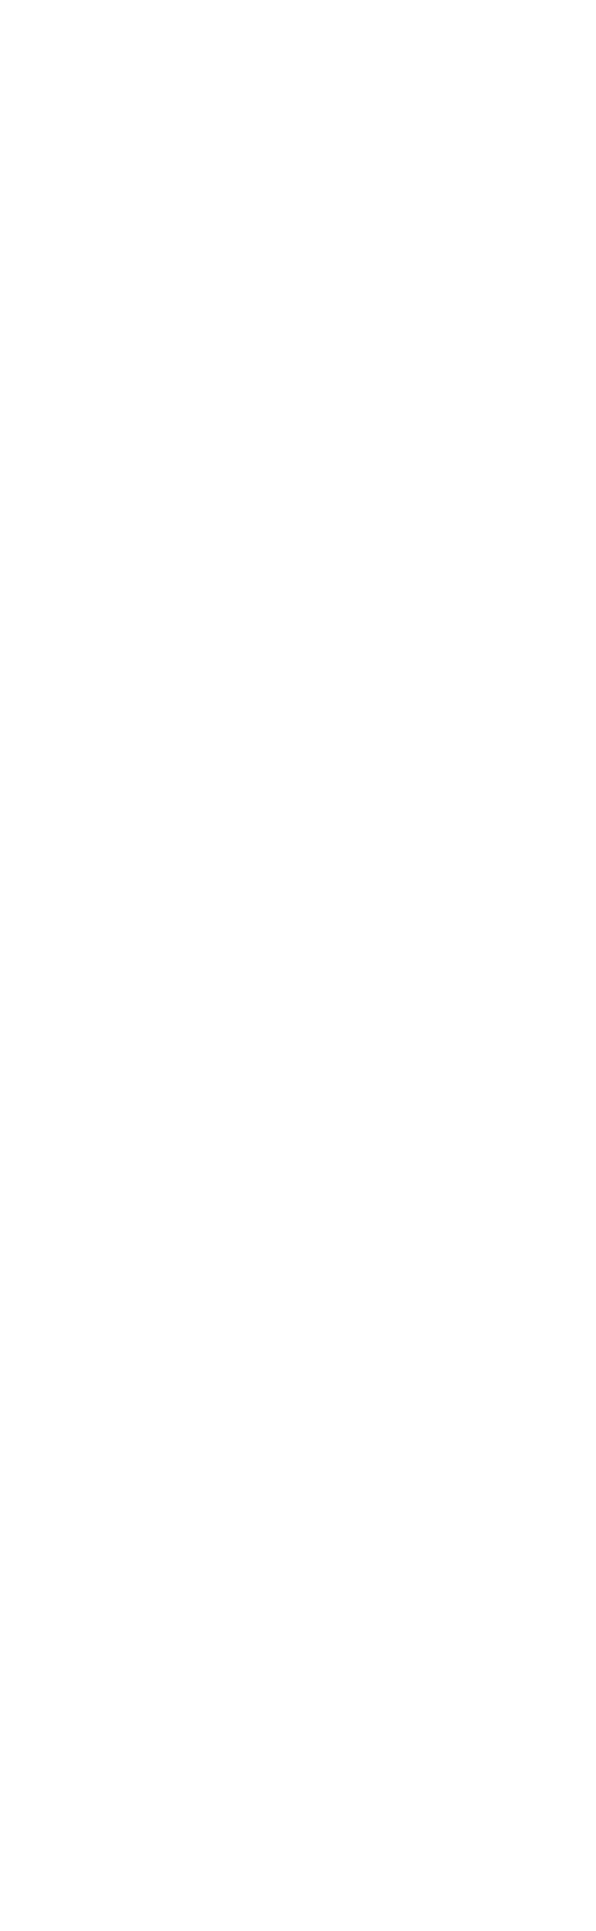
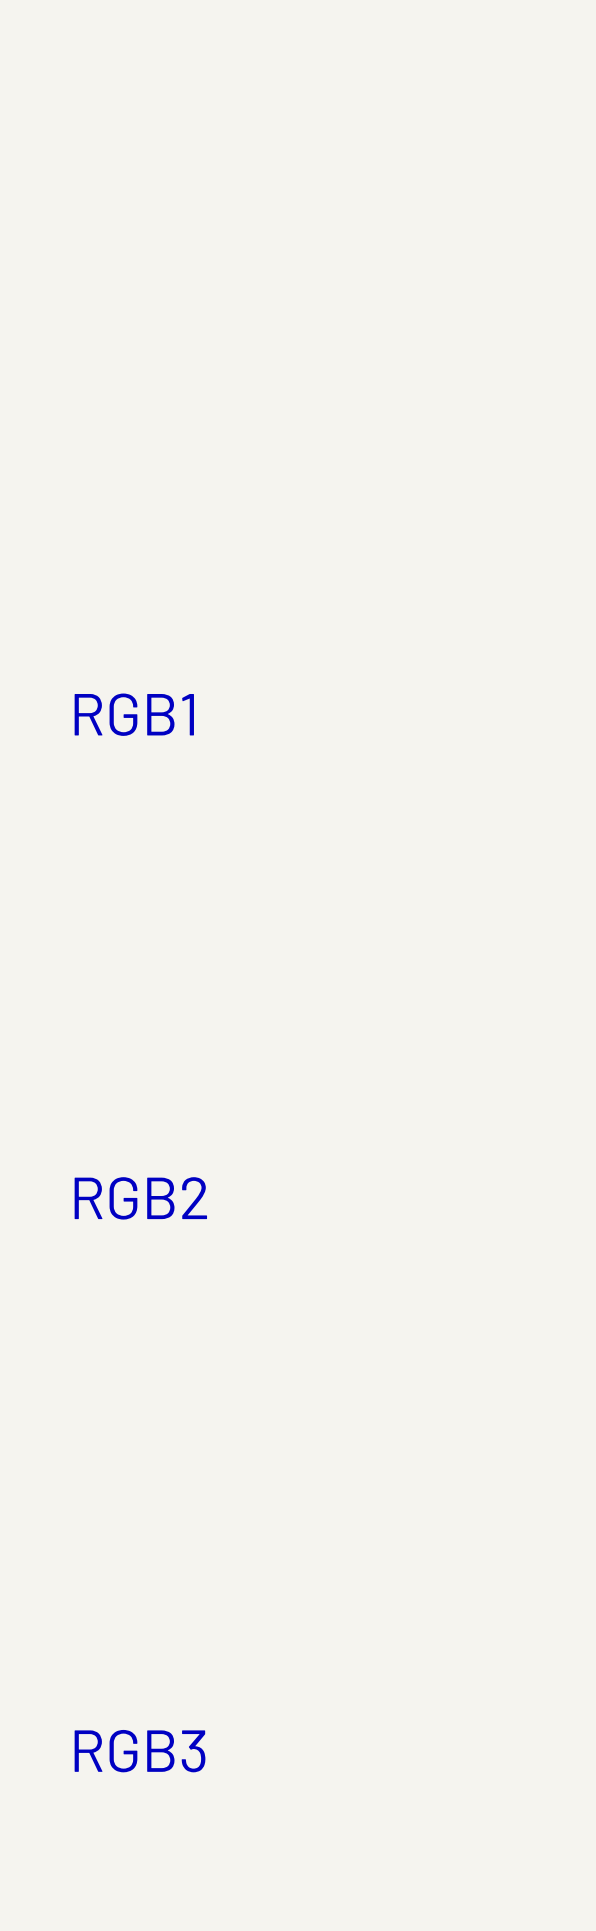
text: none -> RGB1 (134, 714)
text: none -> RGB2 (140, 1198)
text: none -> RGB3 (140, 1751)

